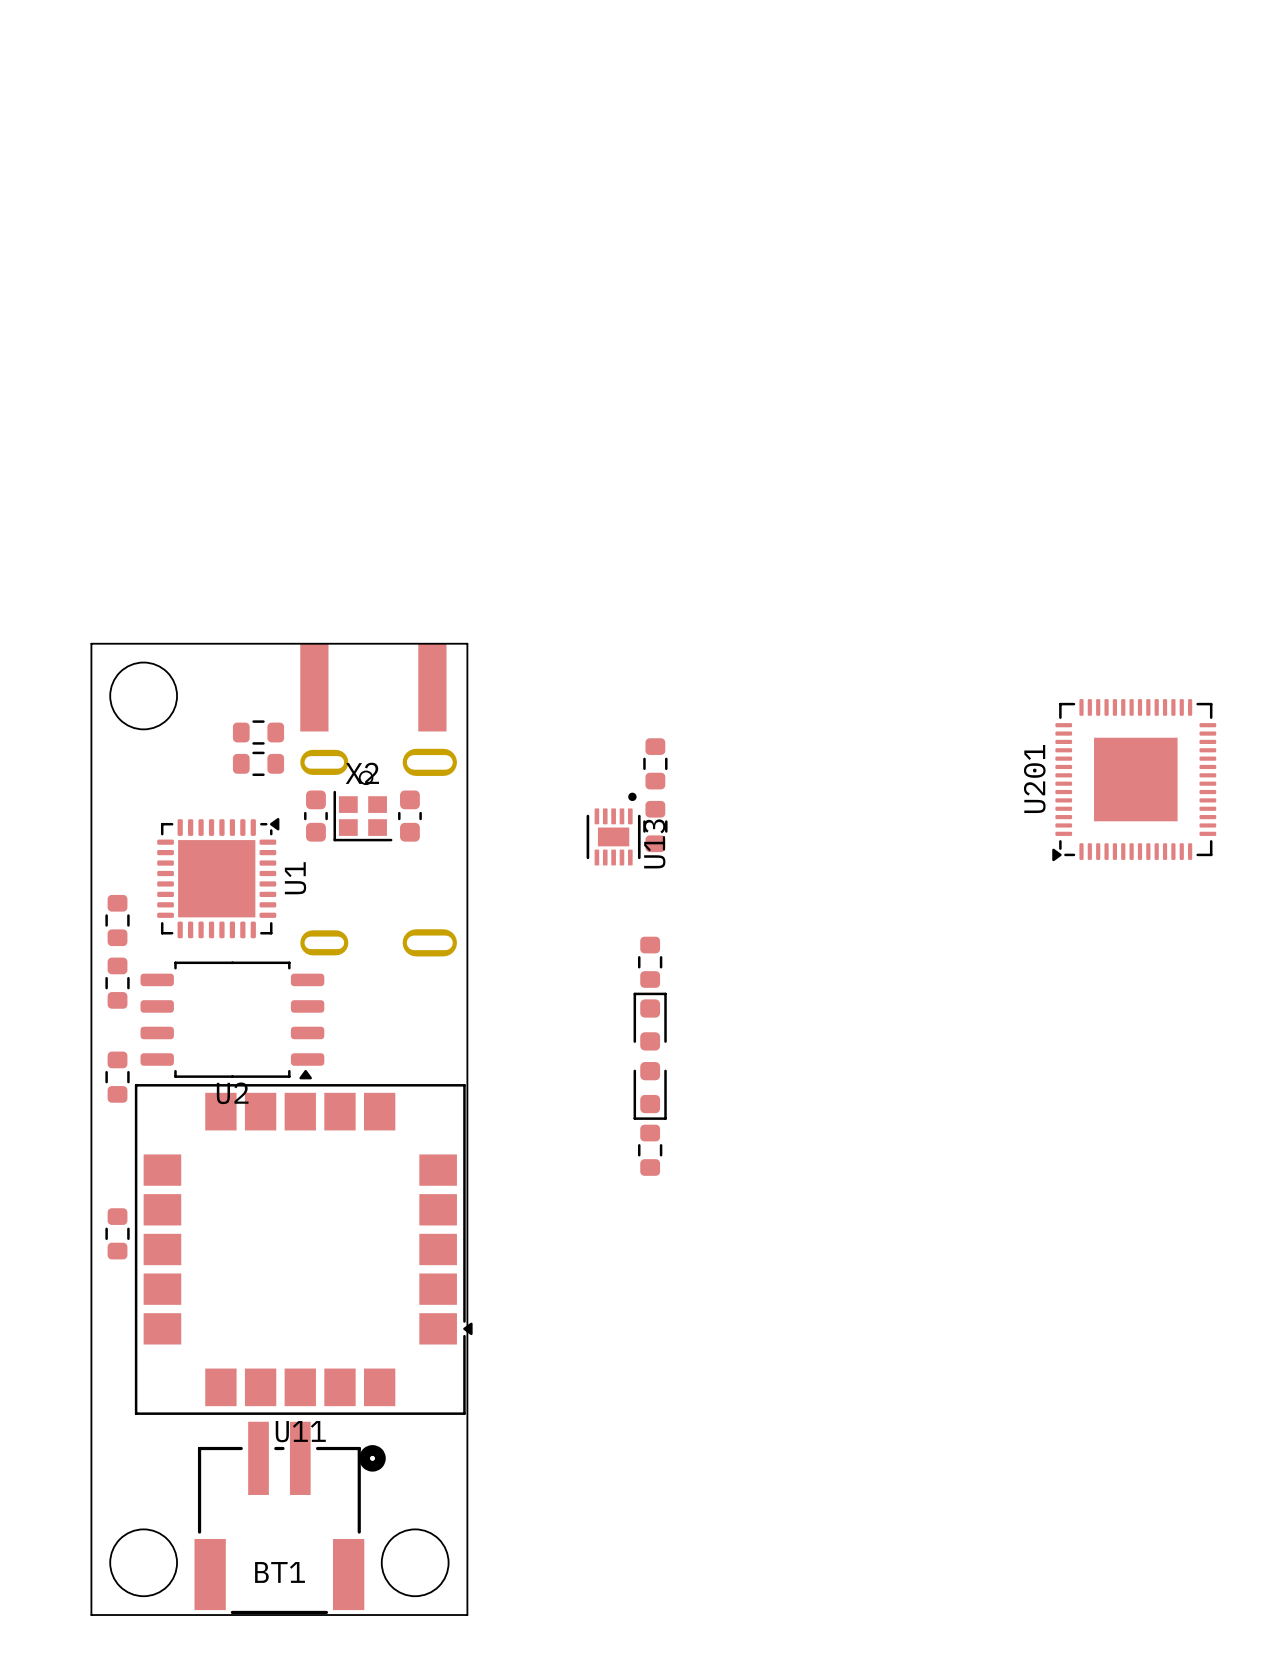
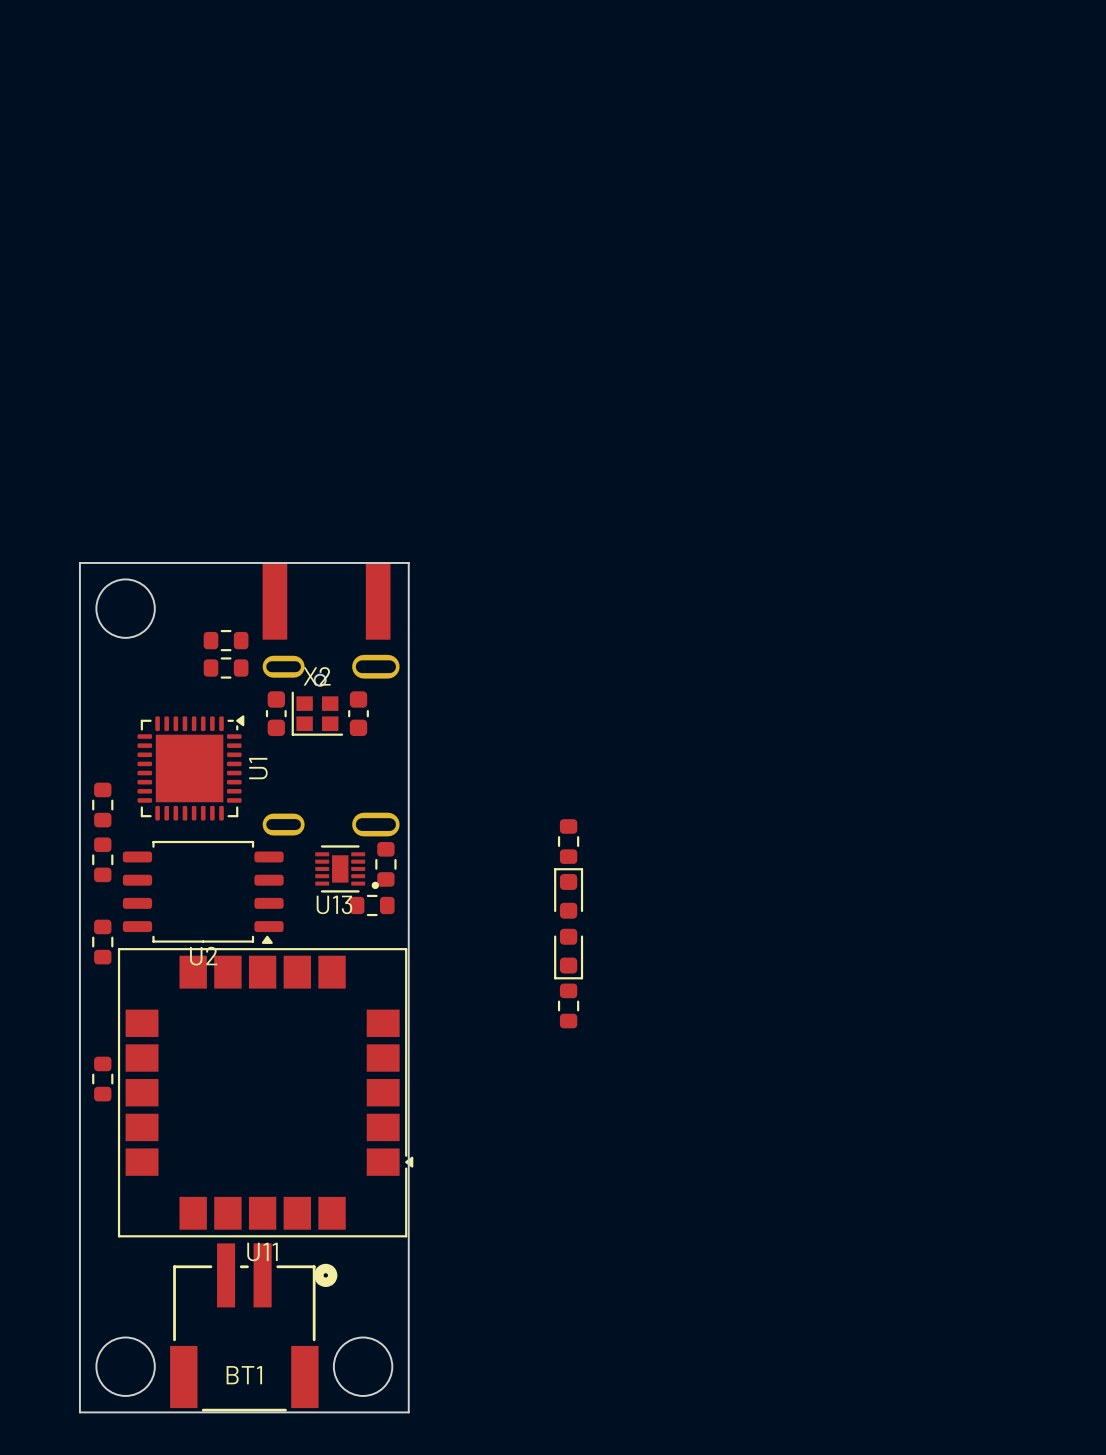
part: (655, 763) -> none
U201: (1134, 780) -> none
part: (655, 826) -> none
U13 rotation: 0° (613, 829) -> 90° clockwise (347, 868)
U13 position: (613, 829) -> (347, 868)
part: none -> (385, 864)
part: none -> (372, 905)

